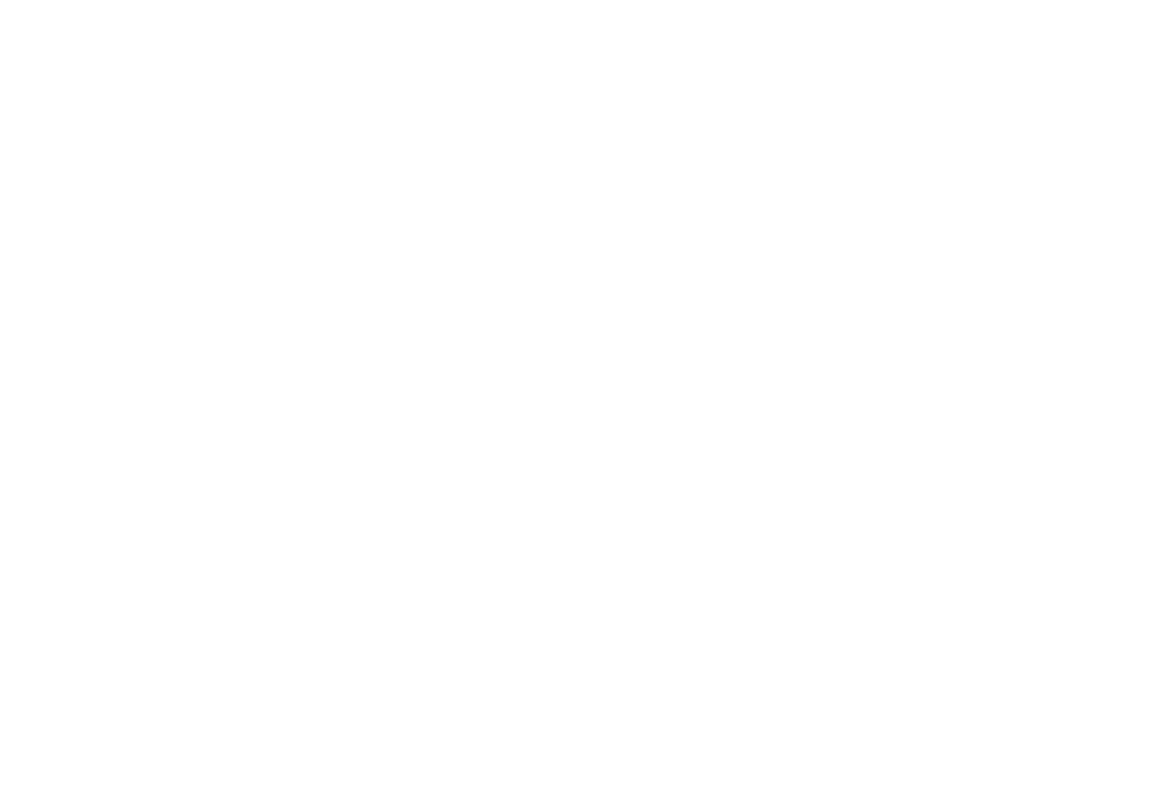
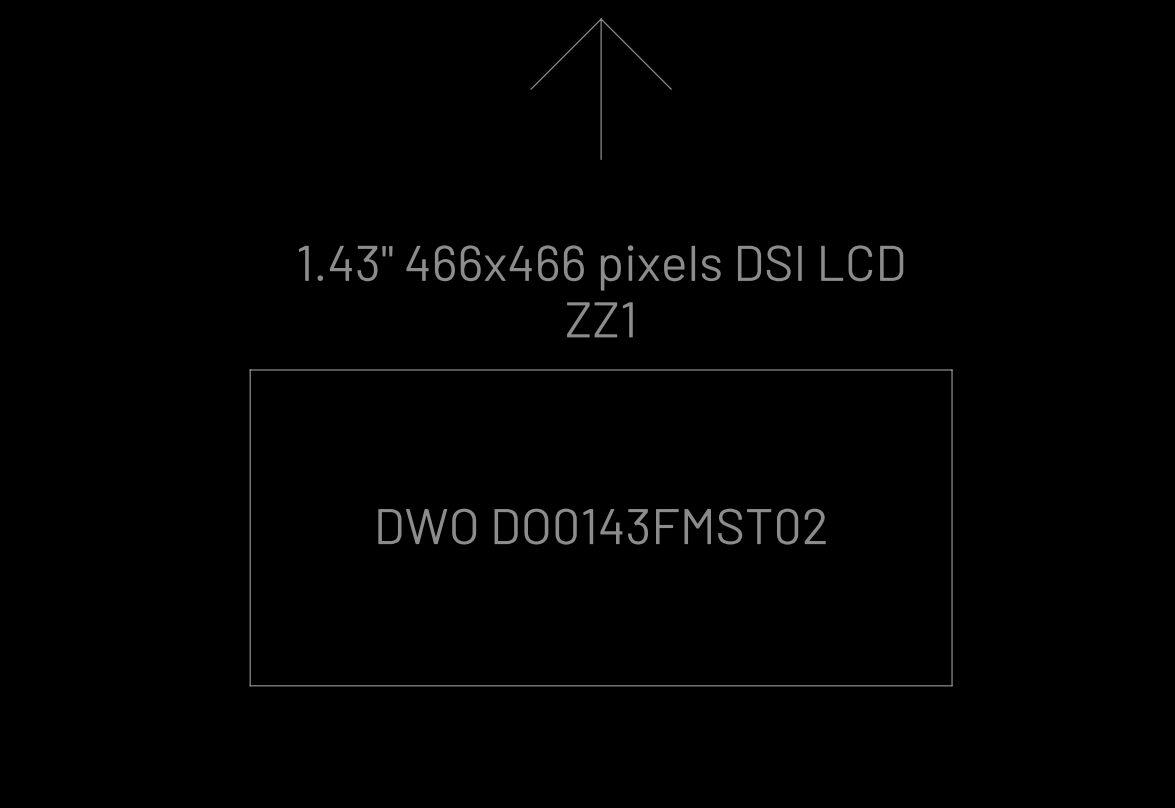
line: none -> (601, 19) (671, 89)
line: none -> (601, 19) (601, 159)
line: none -> (601, 19) (530, 89)
text: none -> 1.43" 466x466 pixels DSI LCD (601, 267)
text: none -> ZZ1 (599, 319)
line: none -> (250, 369) (952, 369) (952, 685) (250, 685) (250, 369)
text: none -> DWO DO0143FMST02 (602, 526)

